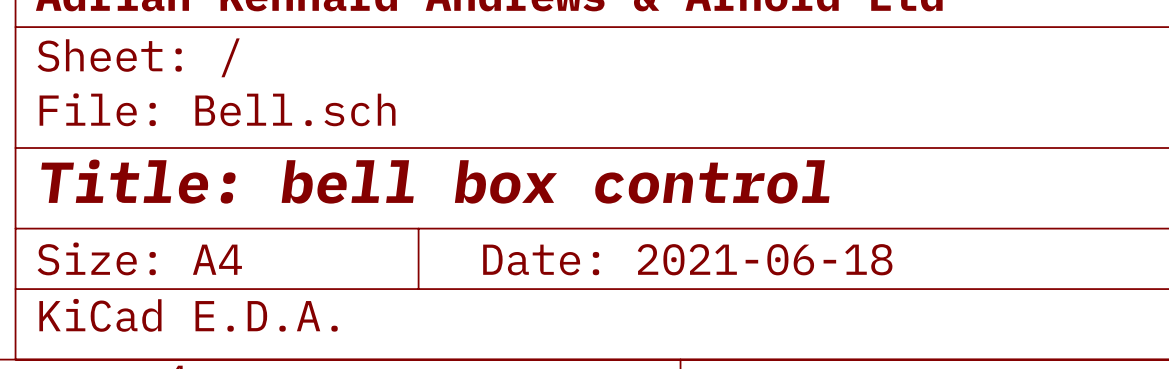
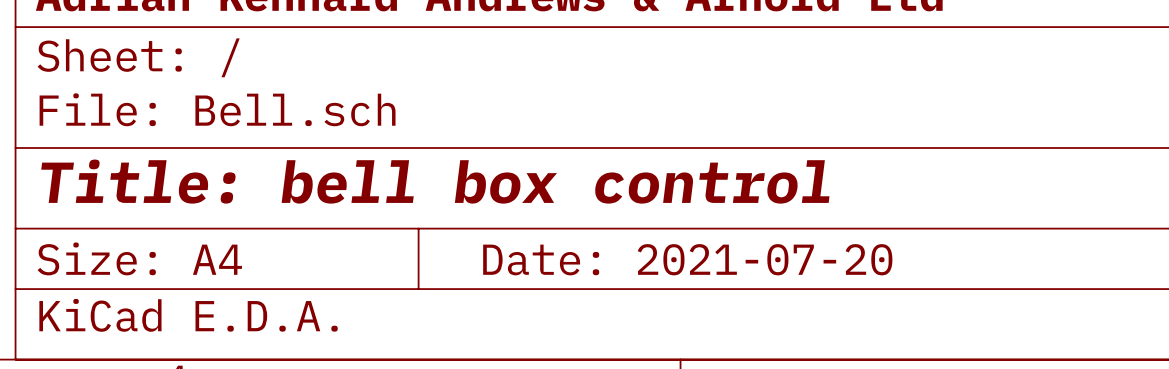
title block: Date: 2021-06-18 (687, 259) -> Date: 2021-07-20 (687, 259)

